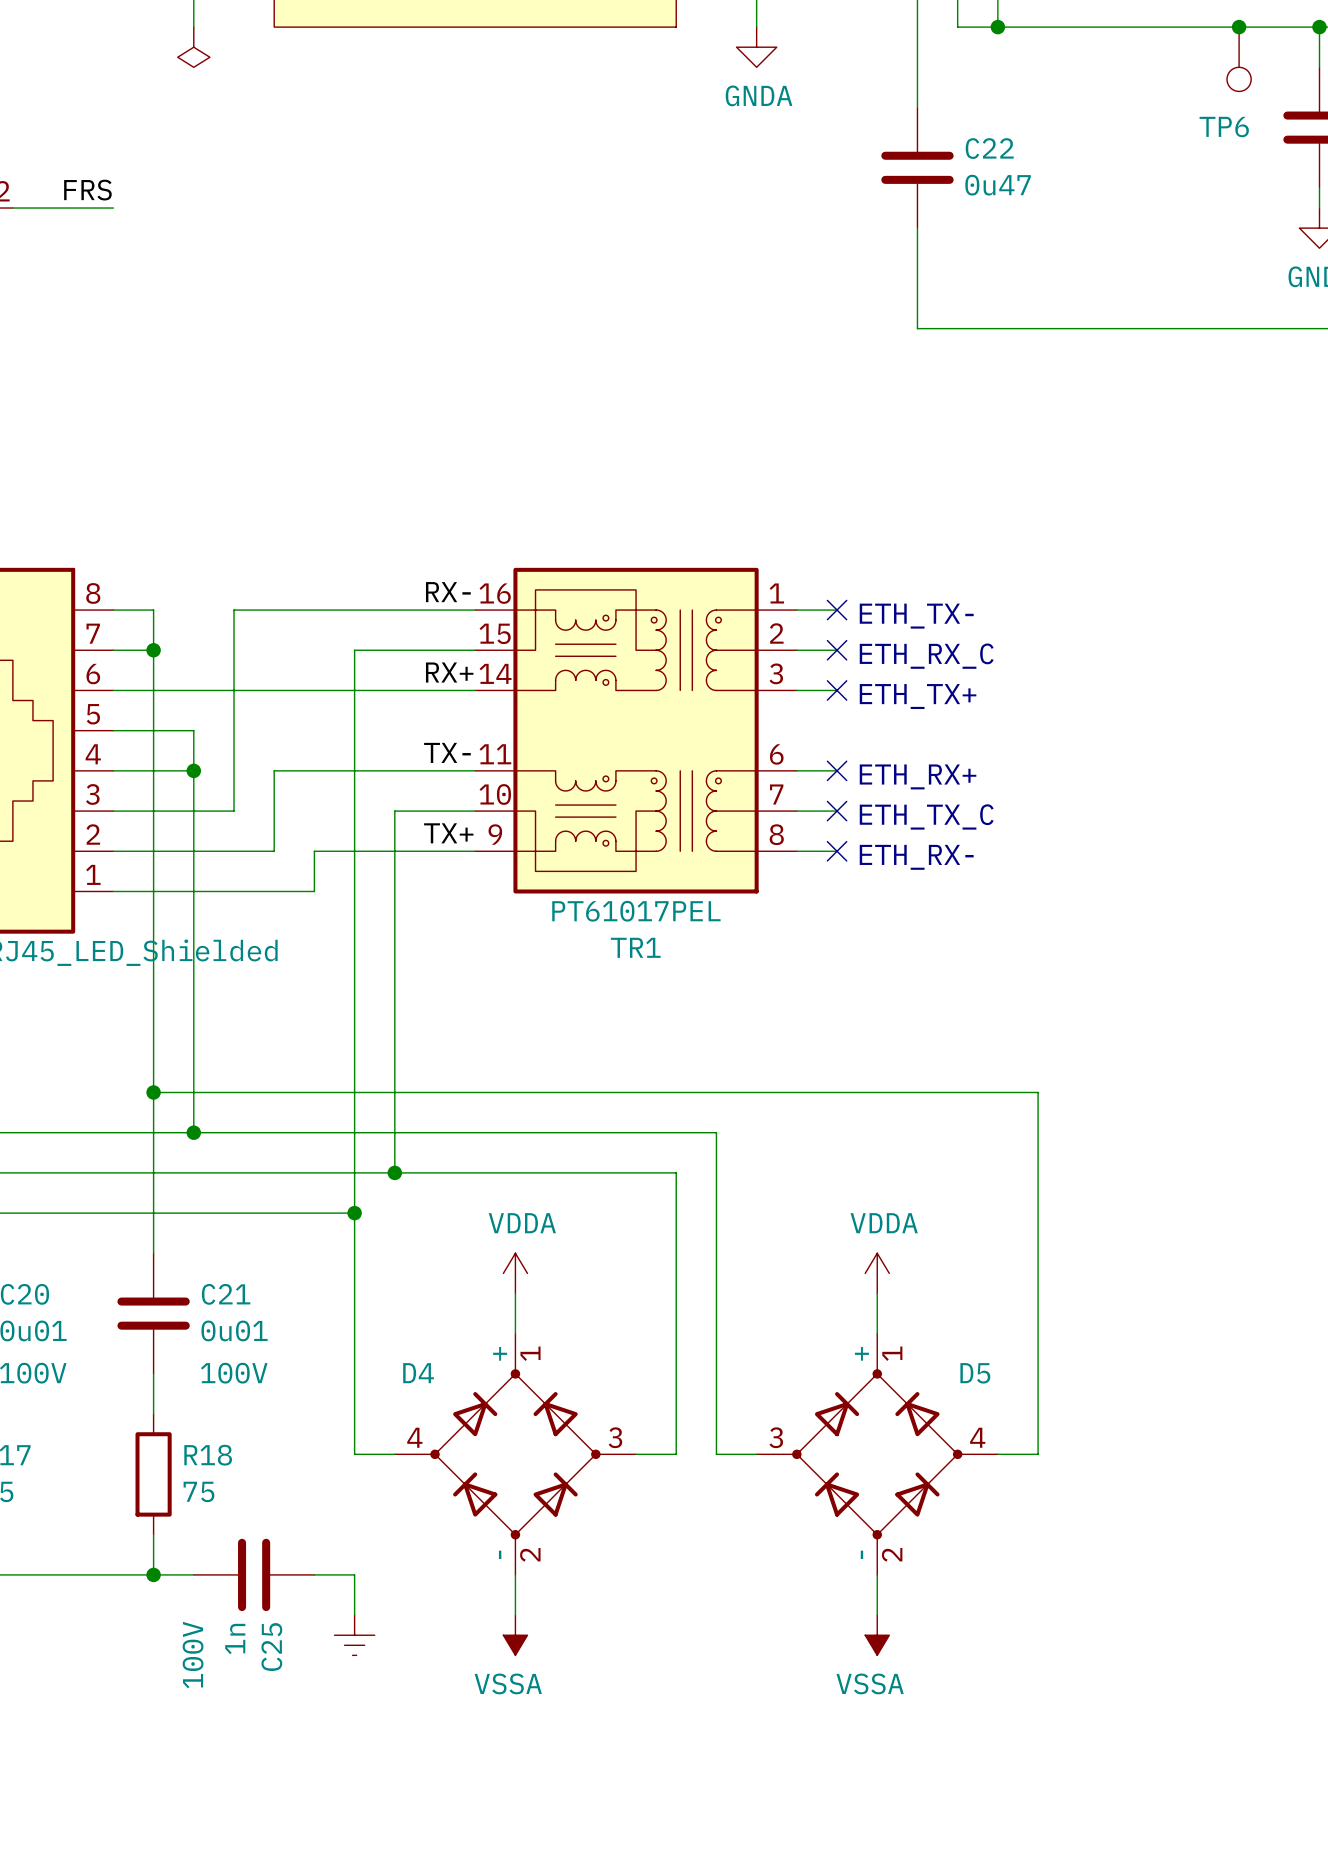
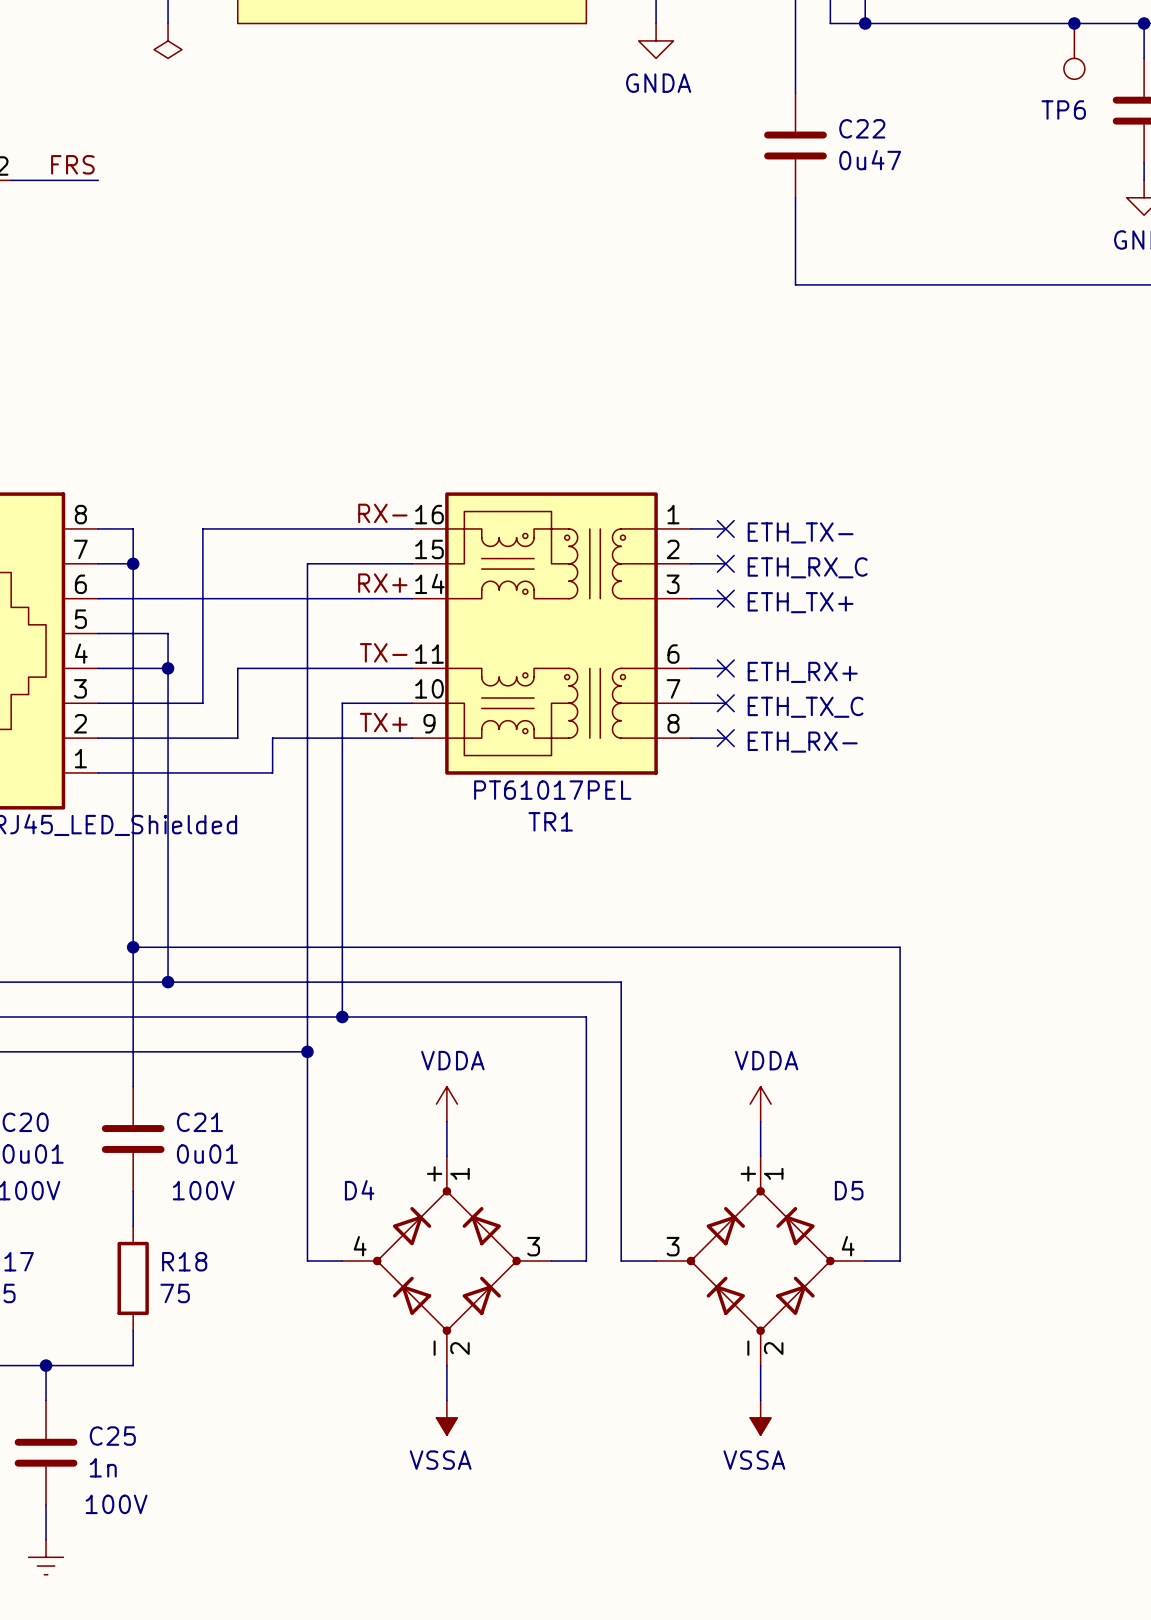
wire: none -> (46, 1365) (46, 1400)
junction: none -> (46, 1365)
wire: (153, 1574) (193, 1574) -> none
junction: (153, 1574) -> none
C25 rotation: 0° (254, 1574) -> 90° clockwise (46, 1452)
C25 position: (254, 1574) -> (46, 1452)
wire: (314, 1574) (354, 1574) (354, 1615) -> none
power symbol position: (354, 1635) -> (46, 1557)
C25 value position: 1n (235, 1639) -> 1n (103, 1467)
C25 name position: C25 (271, 1647) -> C25 (112, 1436)
C25 text position: 100V (193, 1655) -> 100V (116, 1504)
wire: none -> (46, 1505) (46, 1539)

